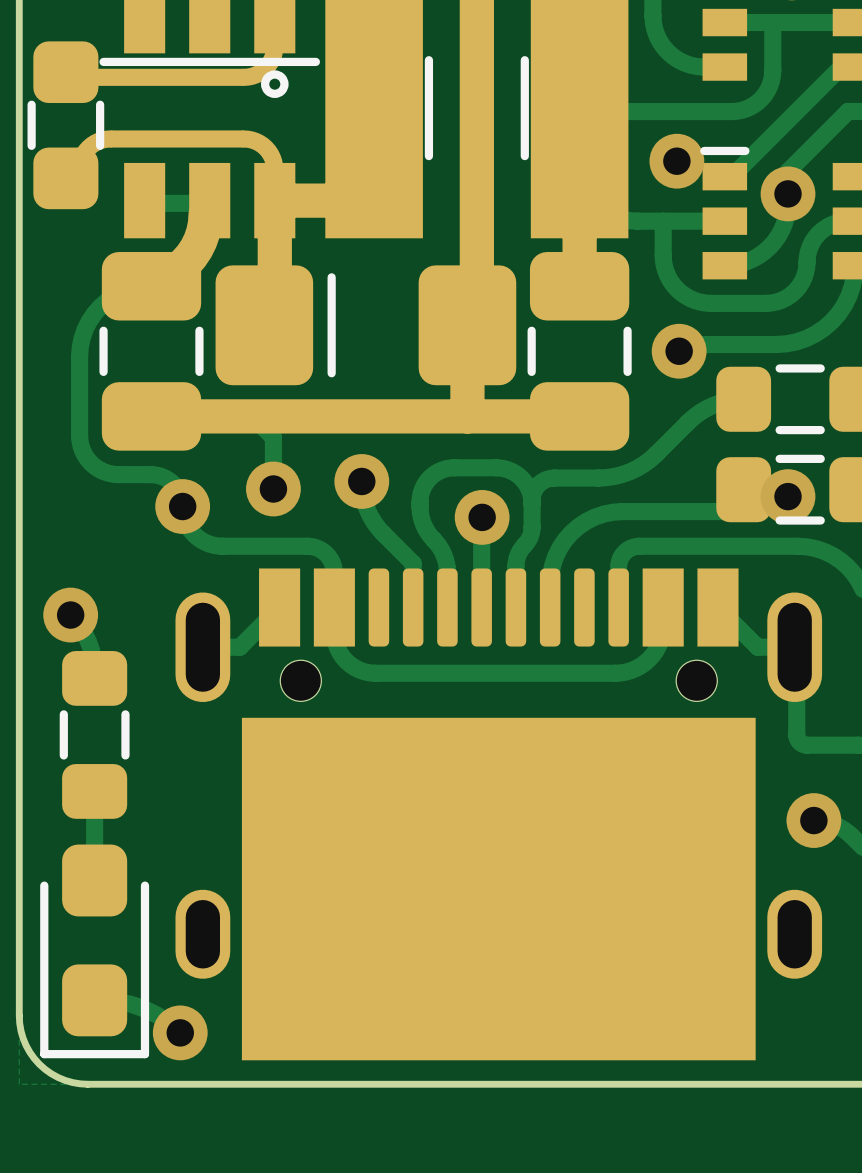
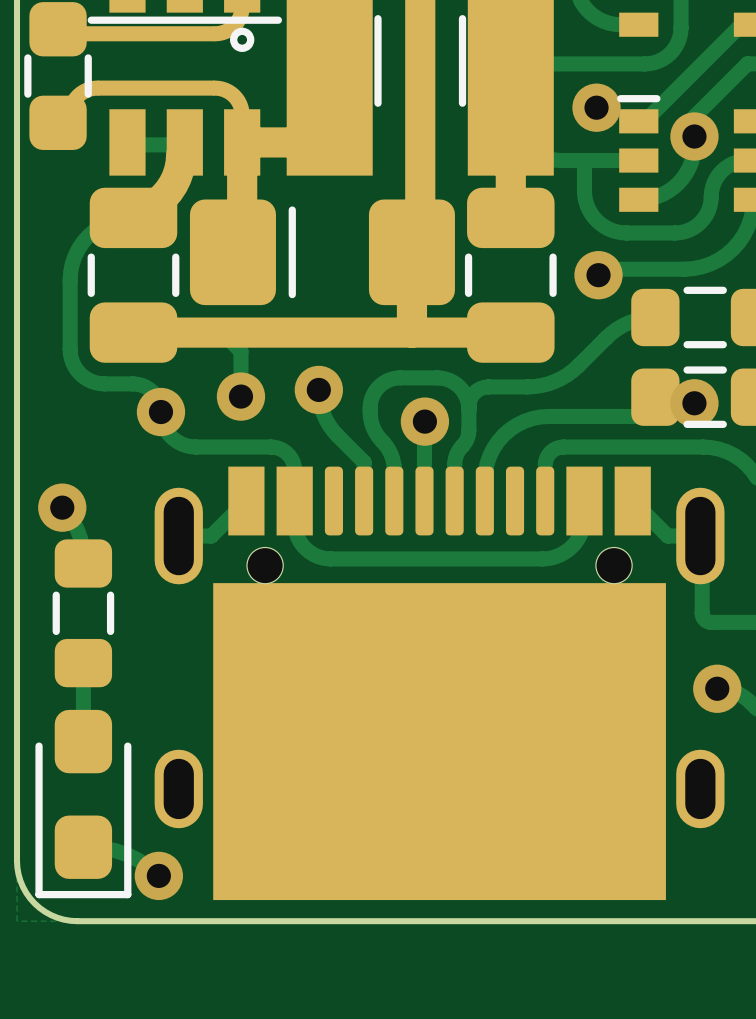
part footprint: [175, 568, 823, 1061] -> [154, 466, 725, 901]

